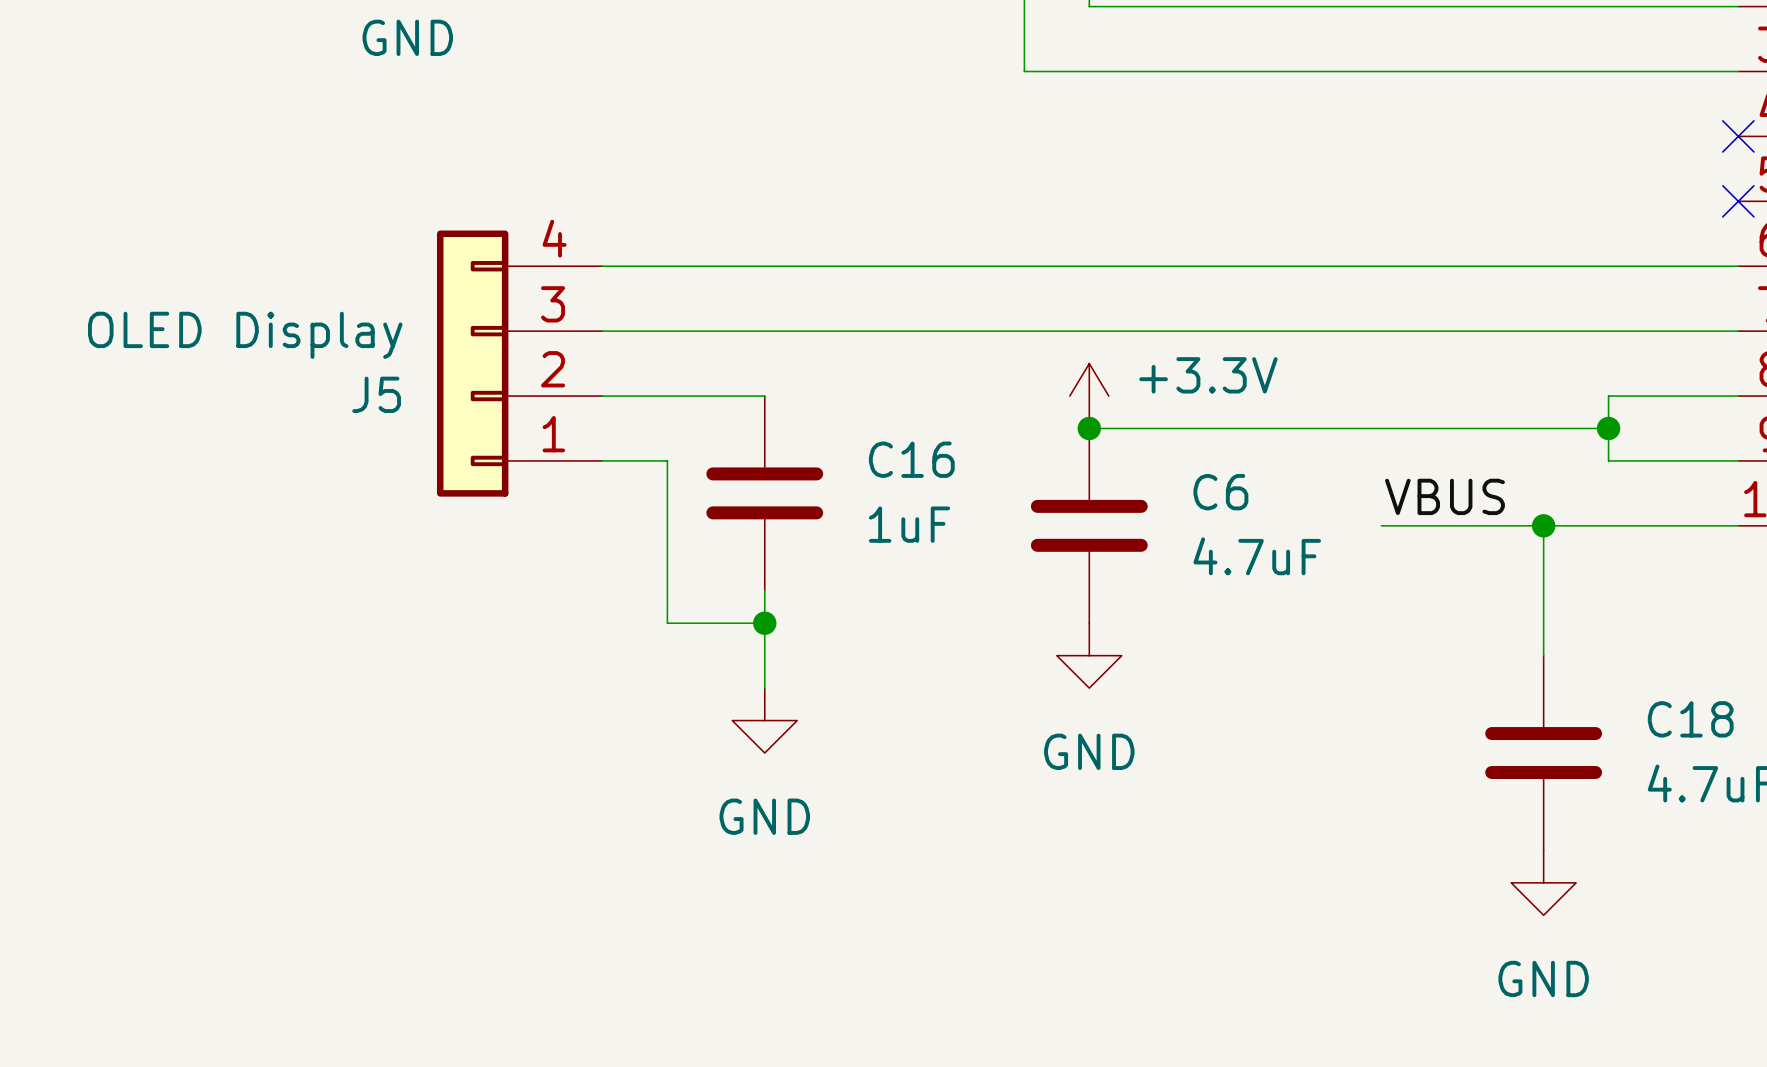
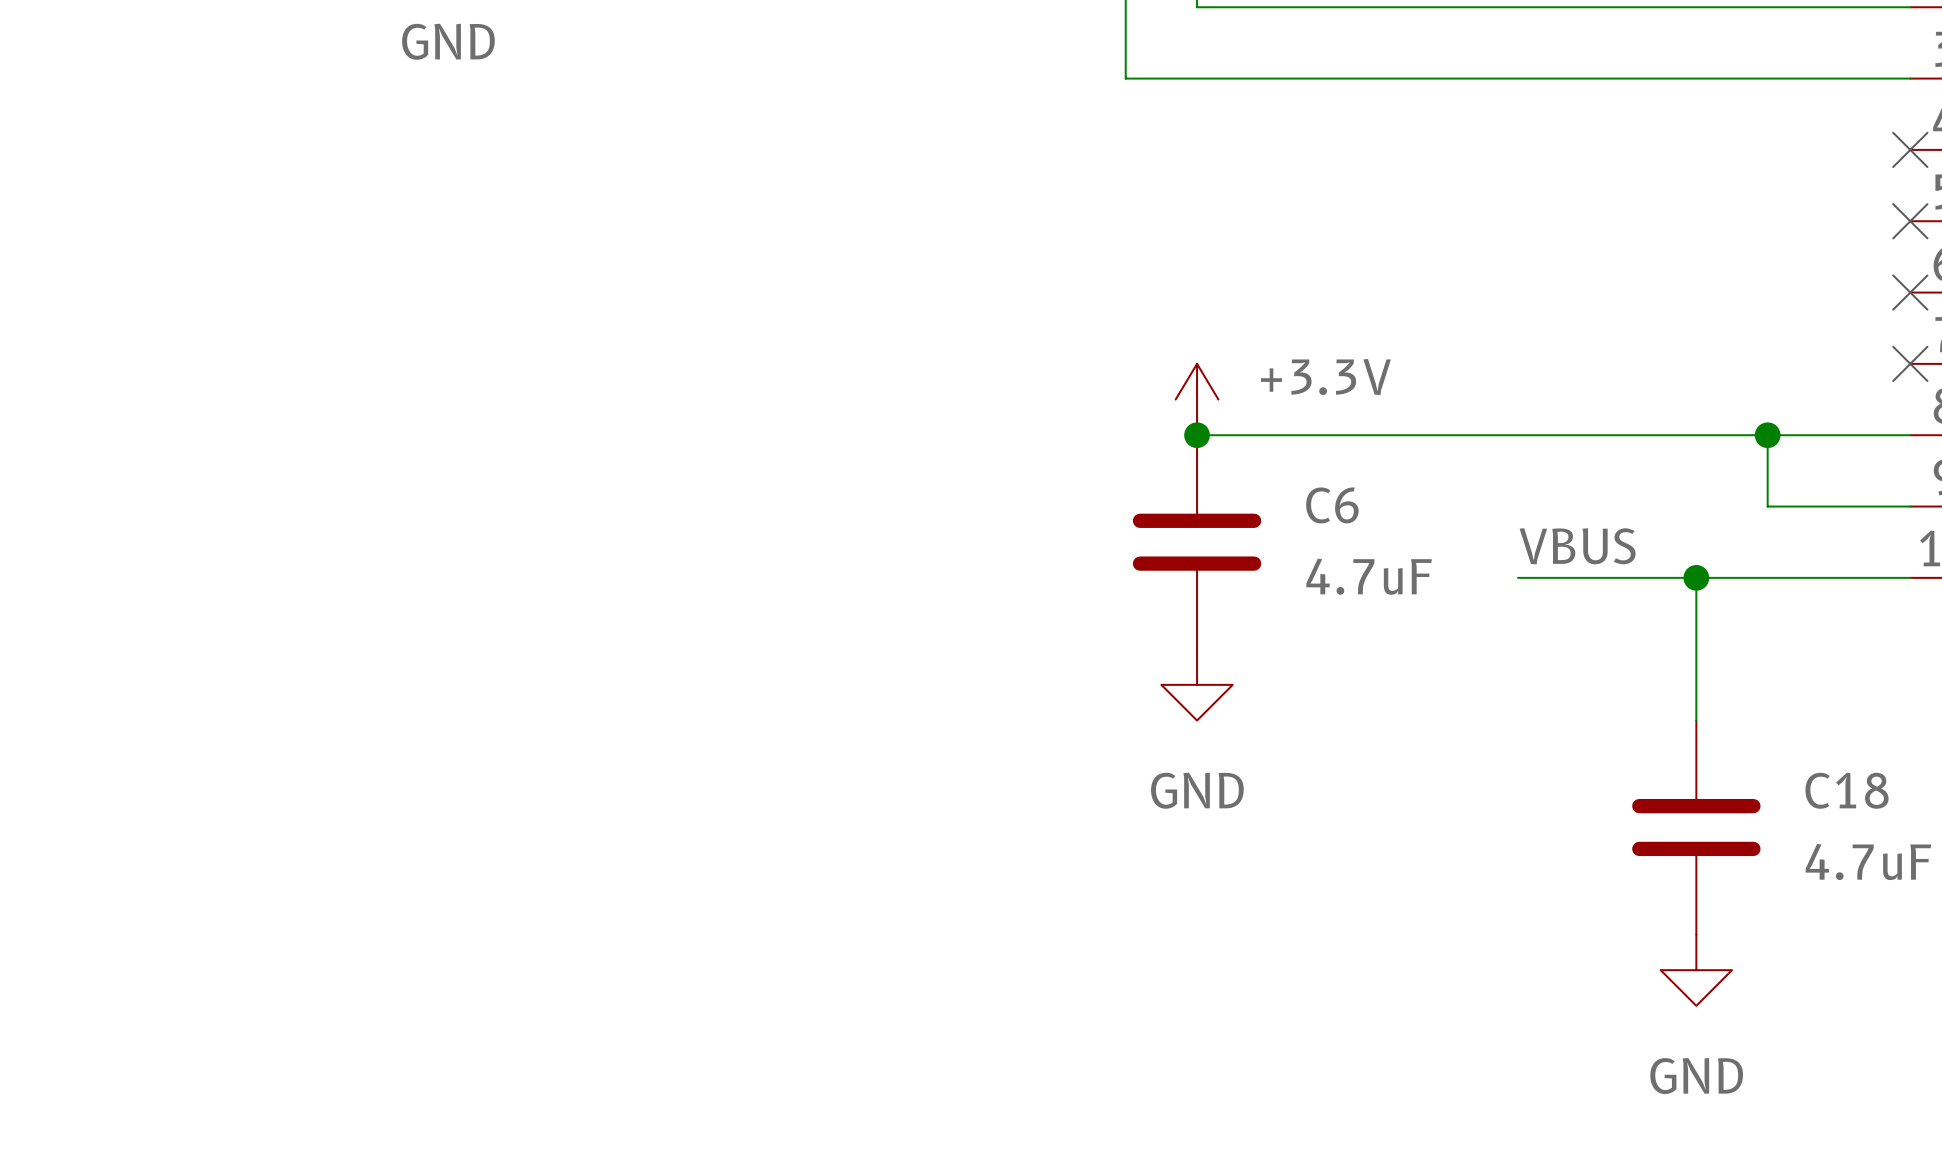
wire: (602, 266) (1738, 266) -> none
no-connect mark: none -> (1910, 292)
wire: (602, 331) (1738, 331) -> none
no-connect mark: none -> (1910, 363)
J5: OLED Display (519, 363) -> none
wire: (602, 396) (764, 396) -> none
power symbol position: +3.3V (1089, 396) -> +3.3V (1197, 399)
wire: (1089, 428) (1608, 428) -> (1197, 435) (1767, 435)
junction position: (1089, 428) -> (1197, 435)
junction position: (1608, 428) -> (1767, 435)
wire: (602, 460) (667, 460) (667, 623) (764, 623) -> none
C16: 1uF (764, 493) -> none
C6 position: (1089, 525) -> (1197, 542)
wire: (764, 590) (764, 688) -> none
junction: (764, 623) -> none
power symbol position: GND (1089, 655) -> GND (1197, 684)
power symbol: GND (764, 720) -> none

